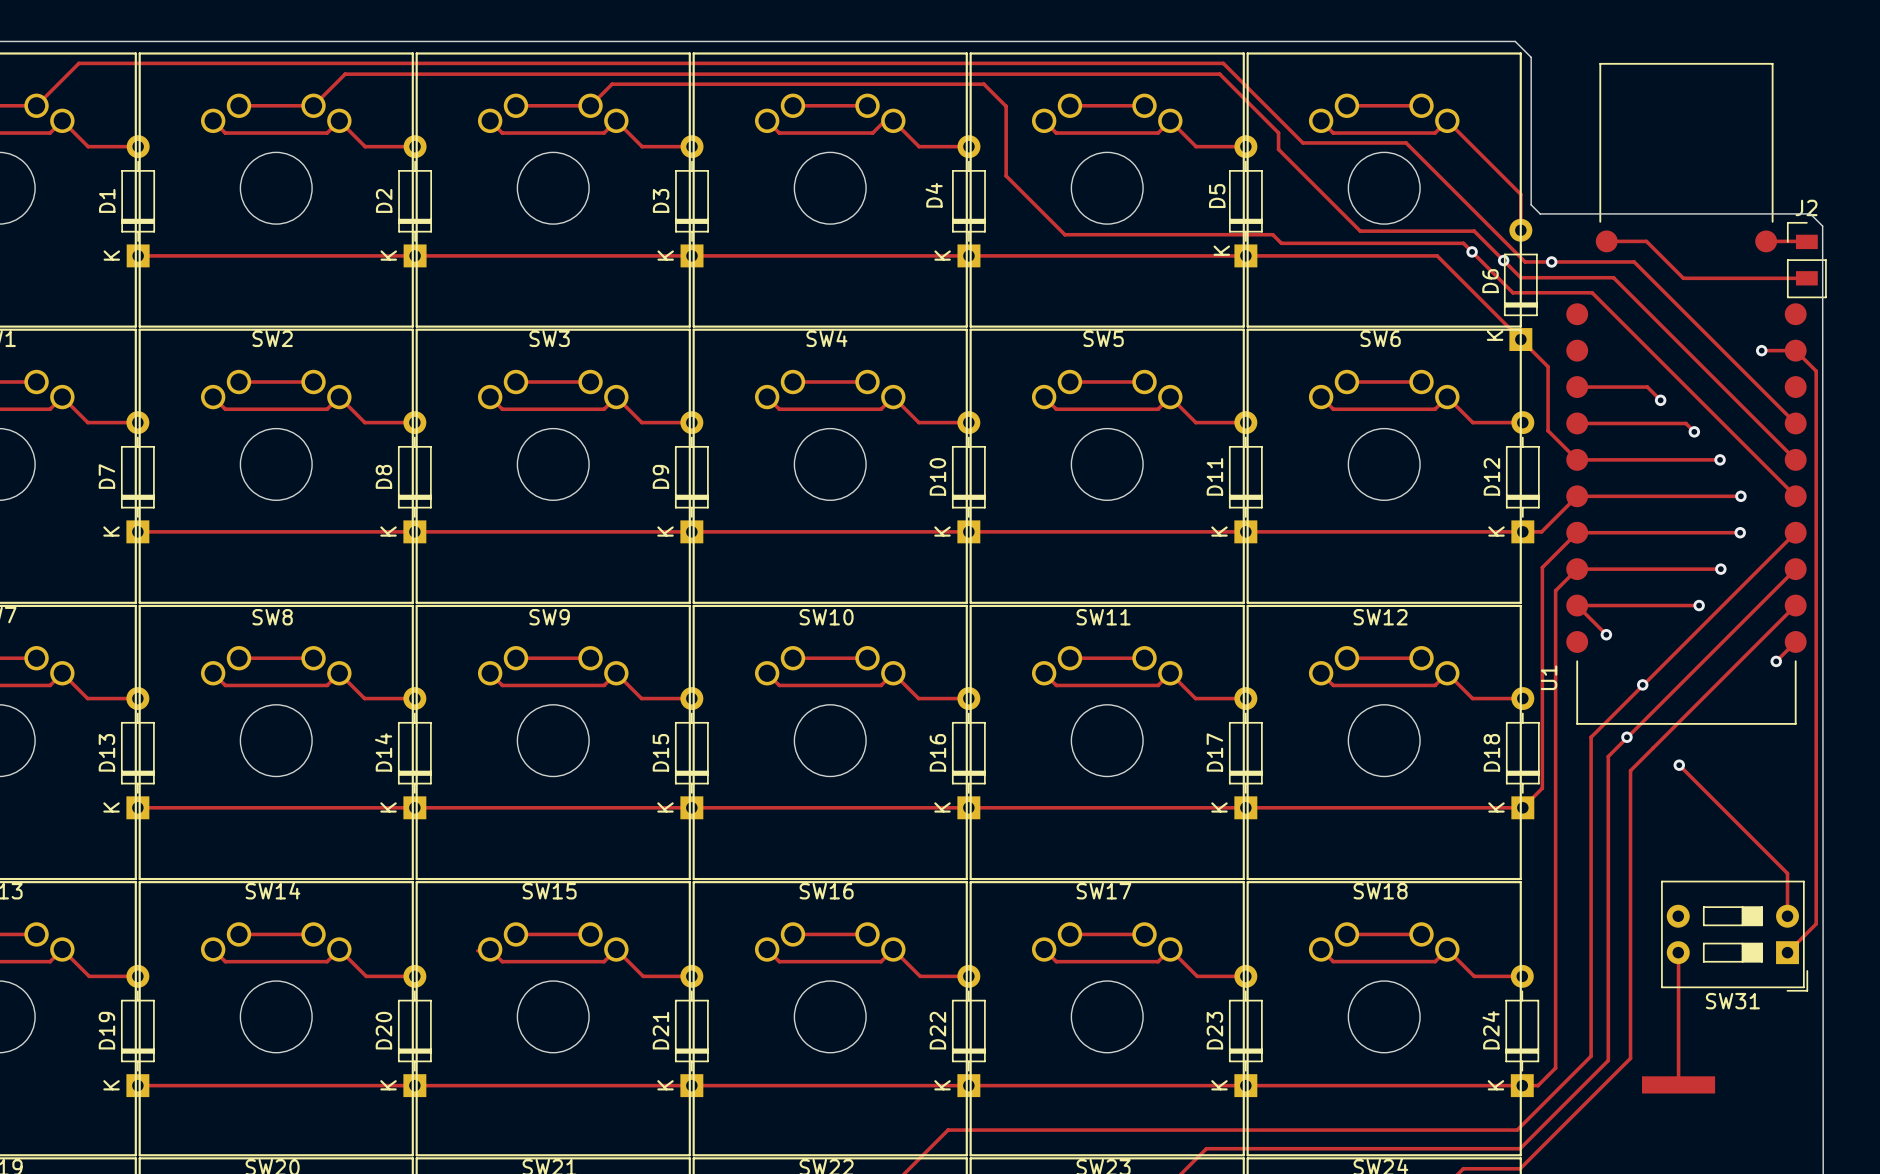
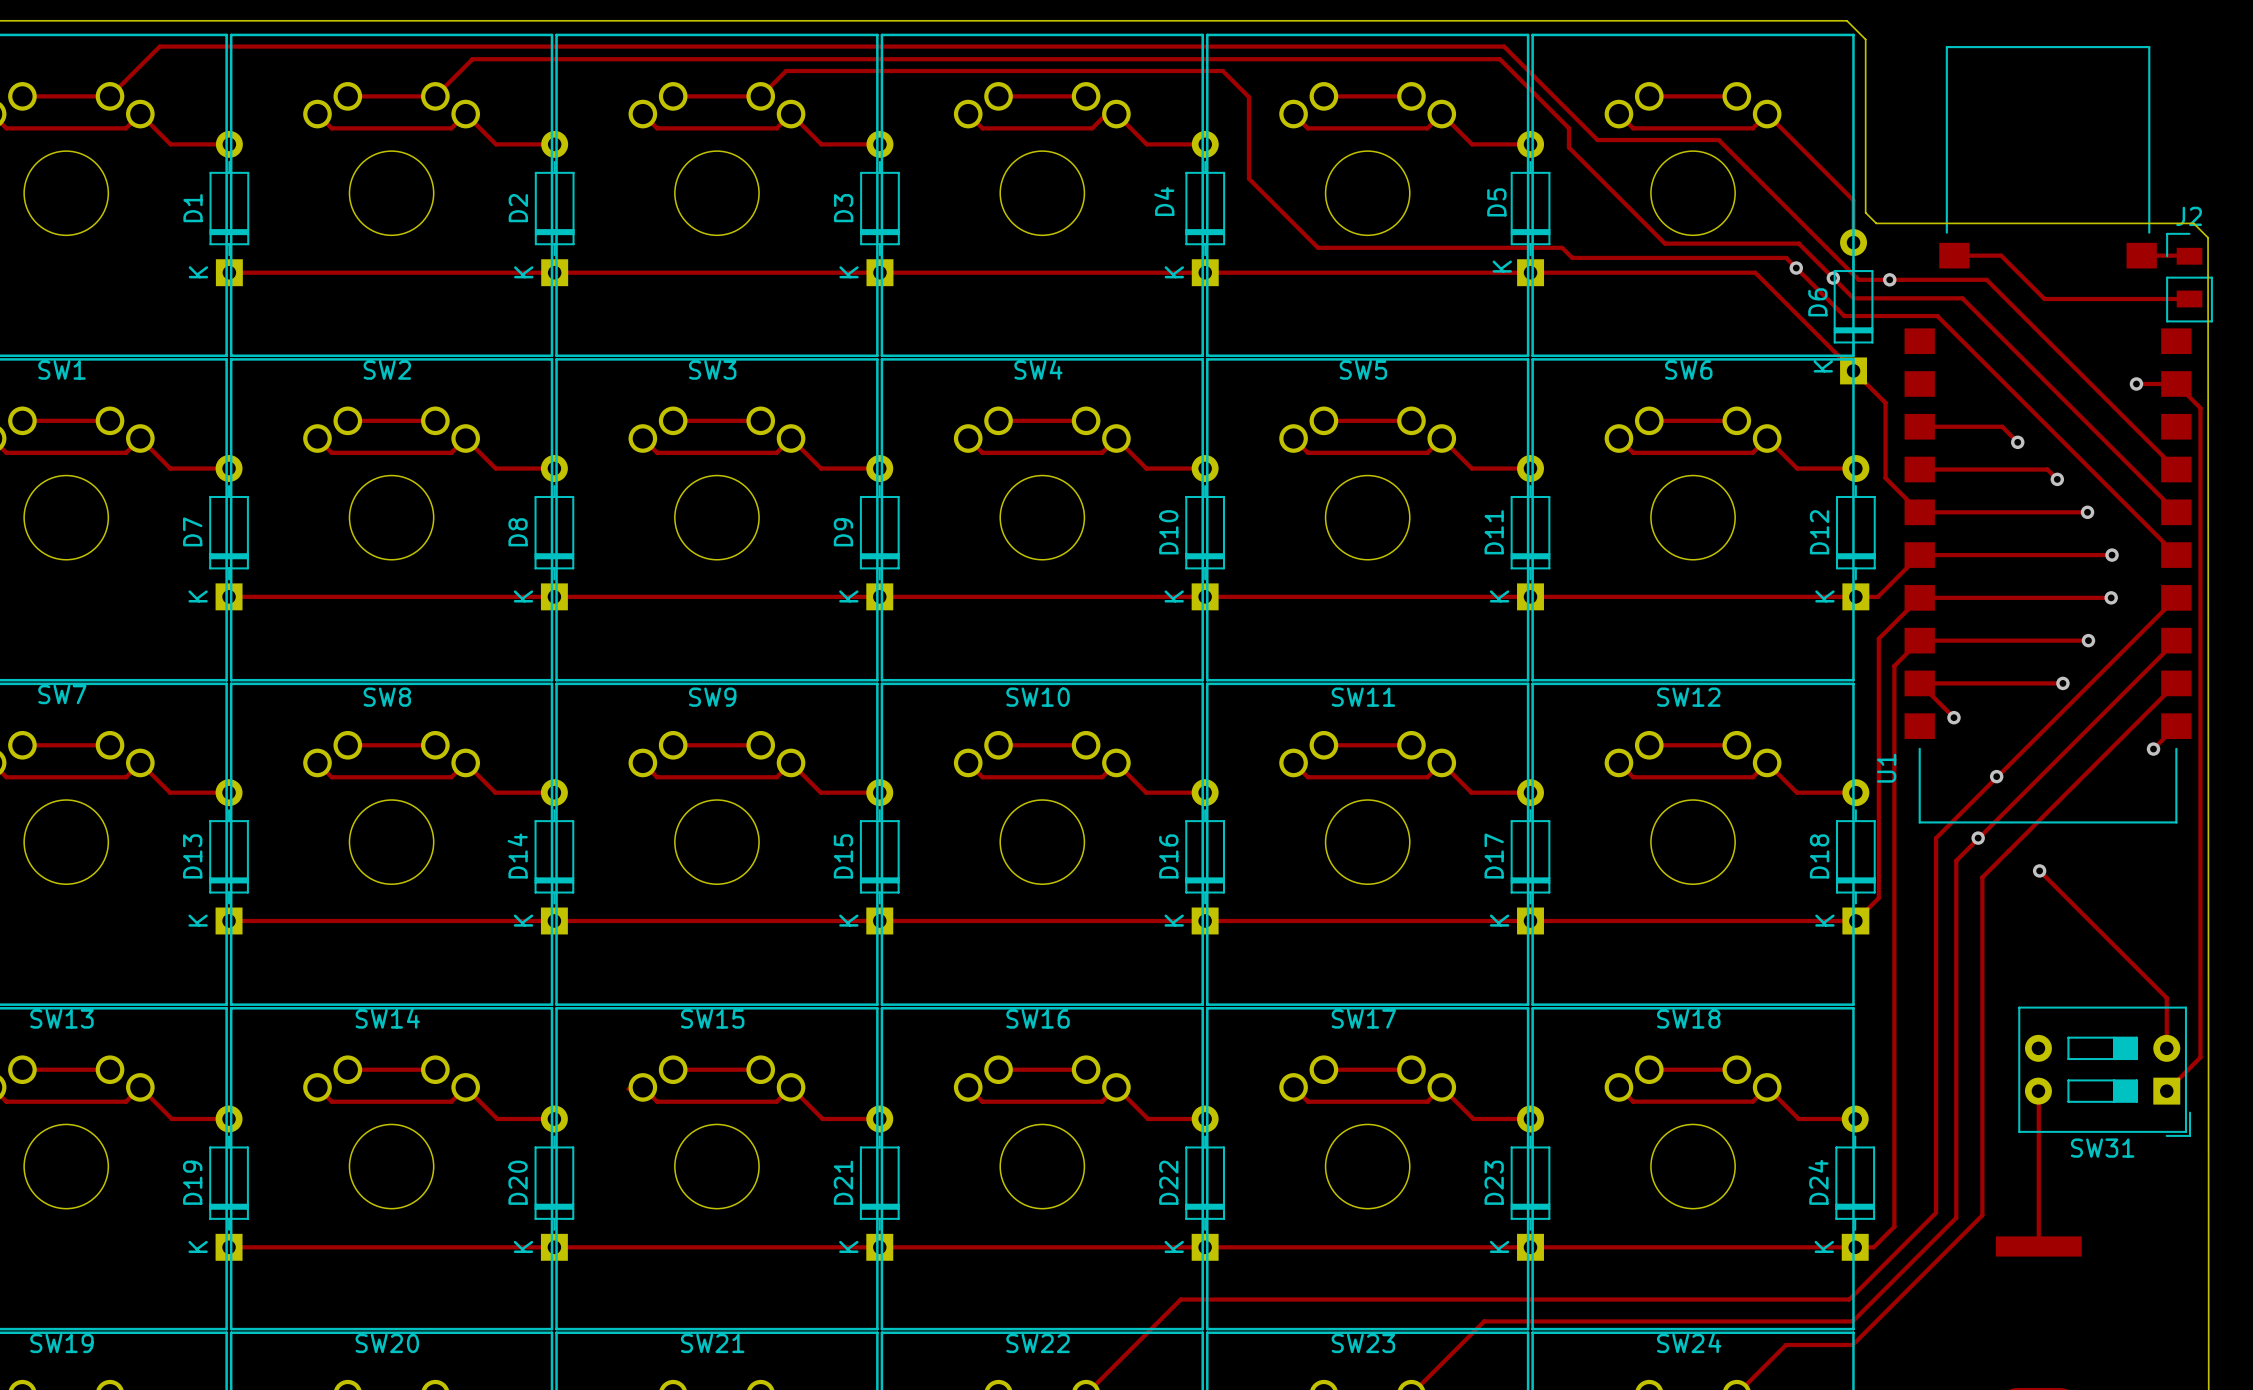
U1 footprint: [1566, 62, 1807, 725] -> [1904, 46, 2192, 824]

